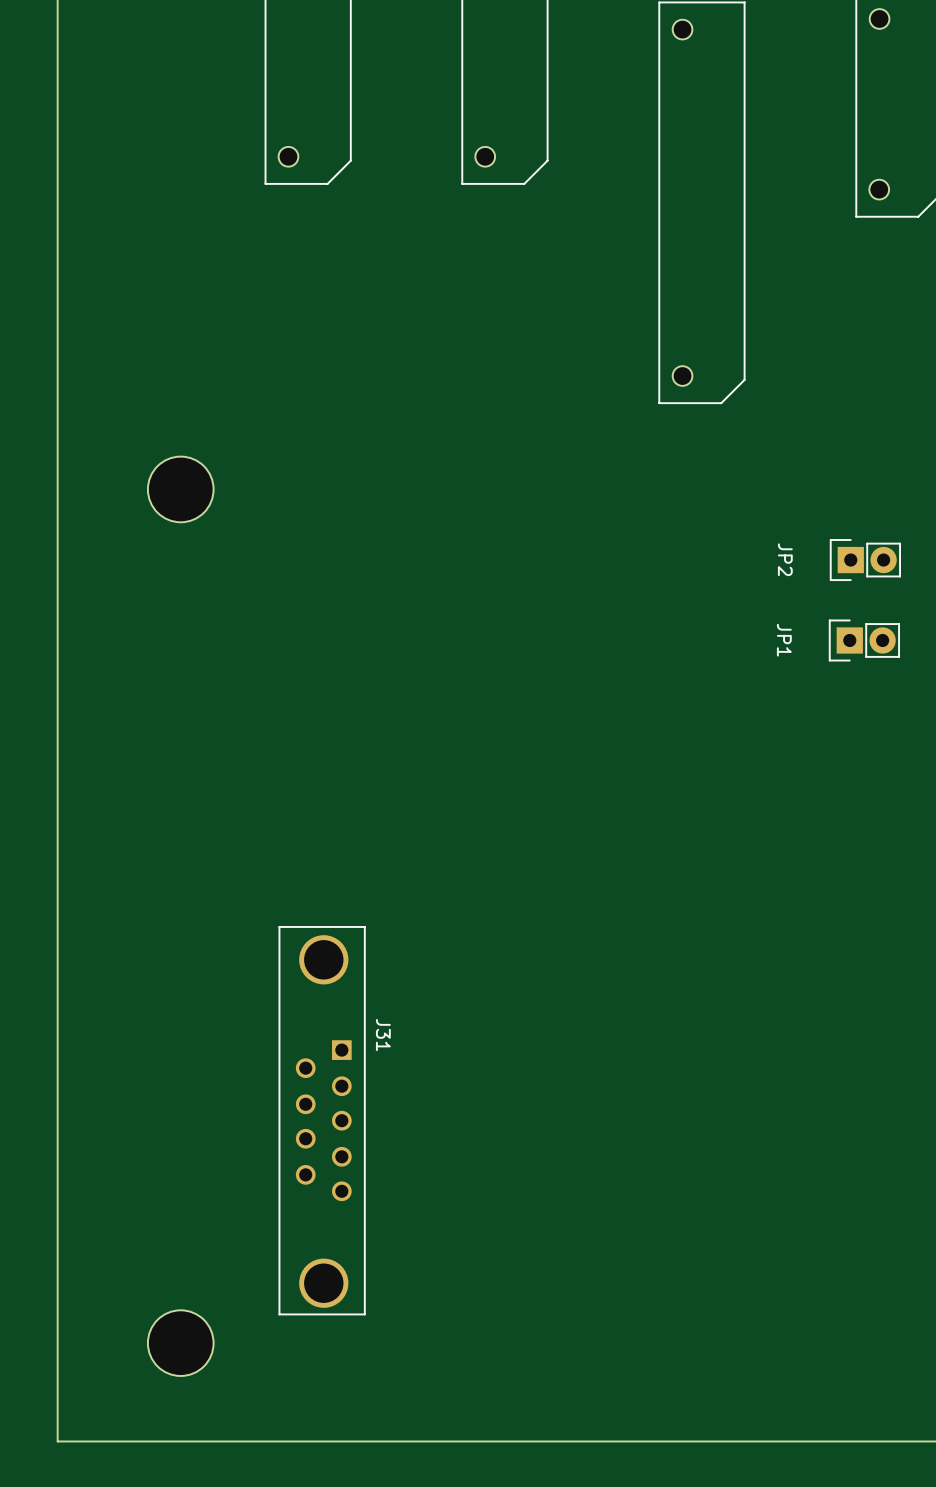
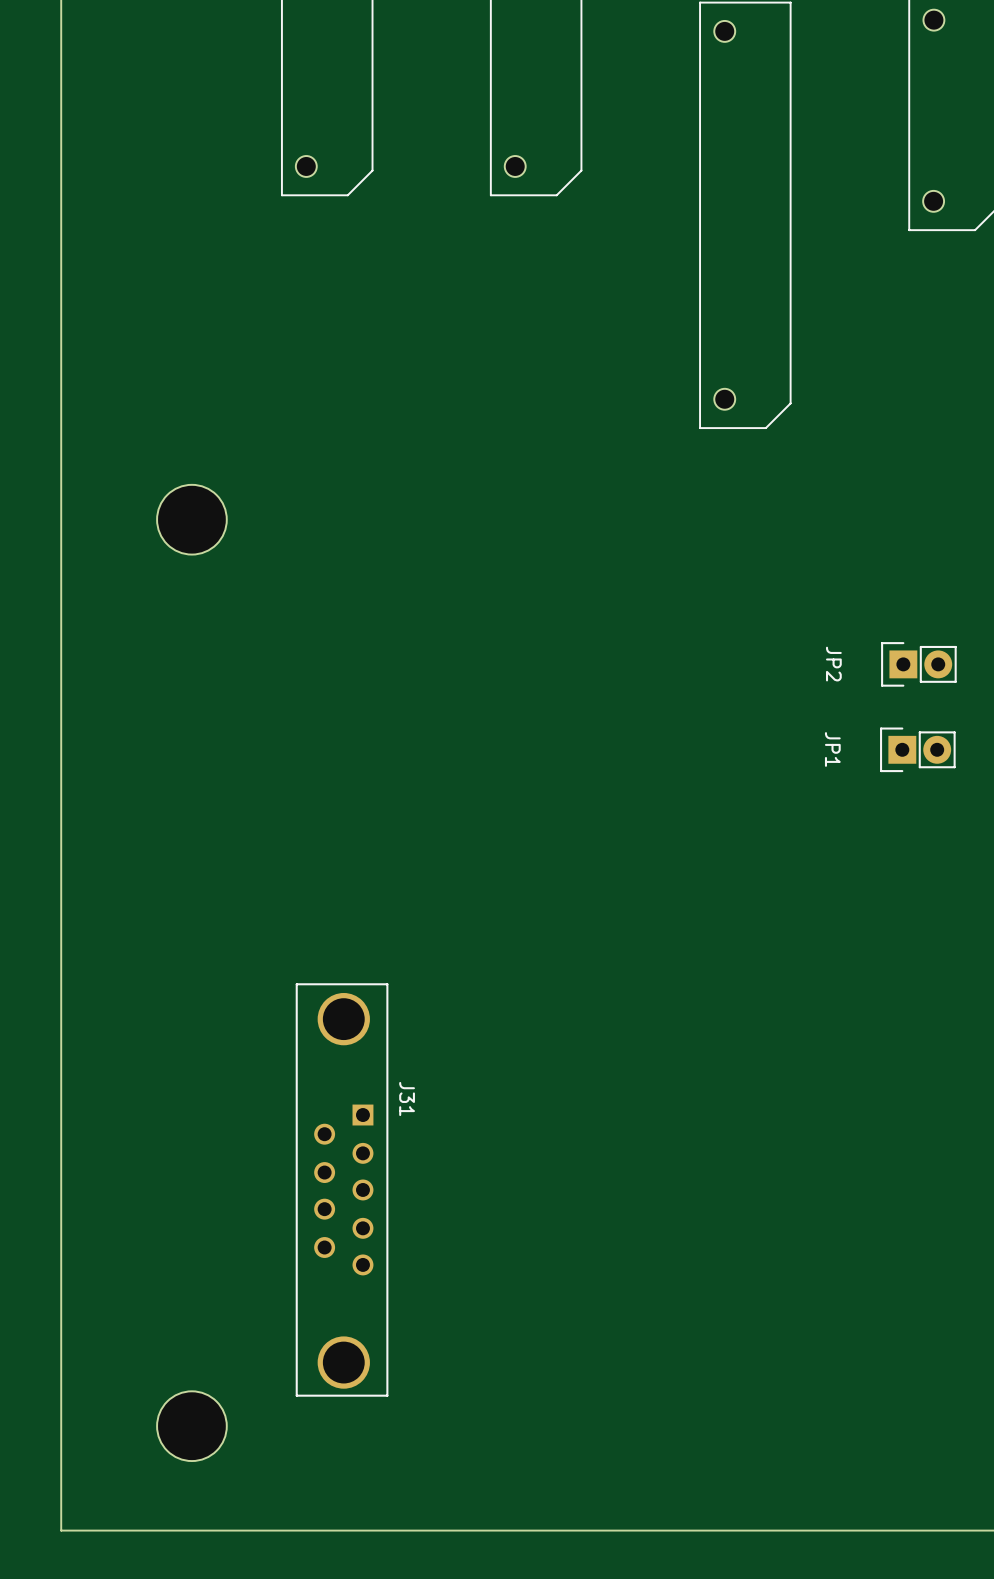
JP2 position: (865, 560) -> (918, 664)
JP1 position: (864, 640) -> (917, 749)

